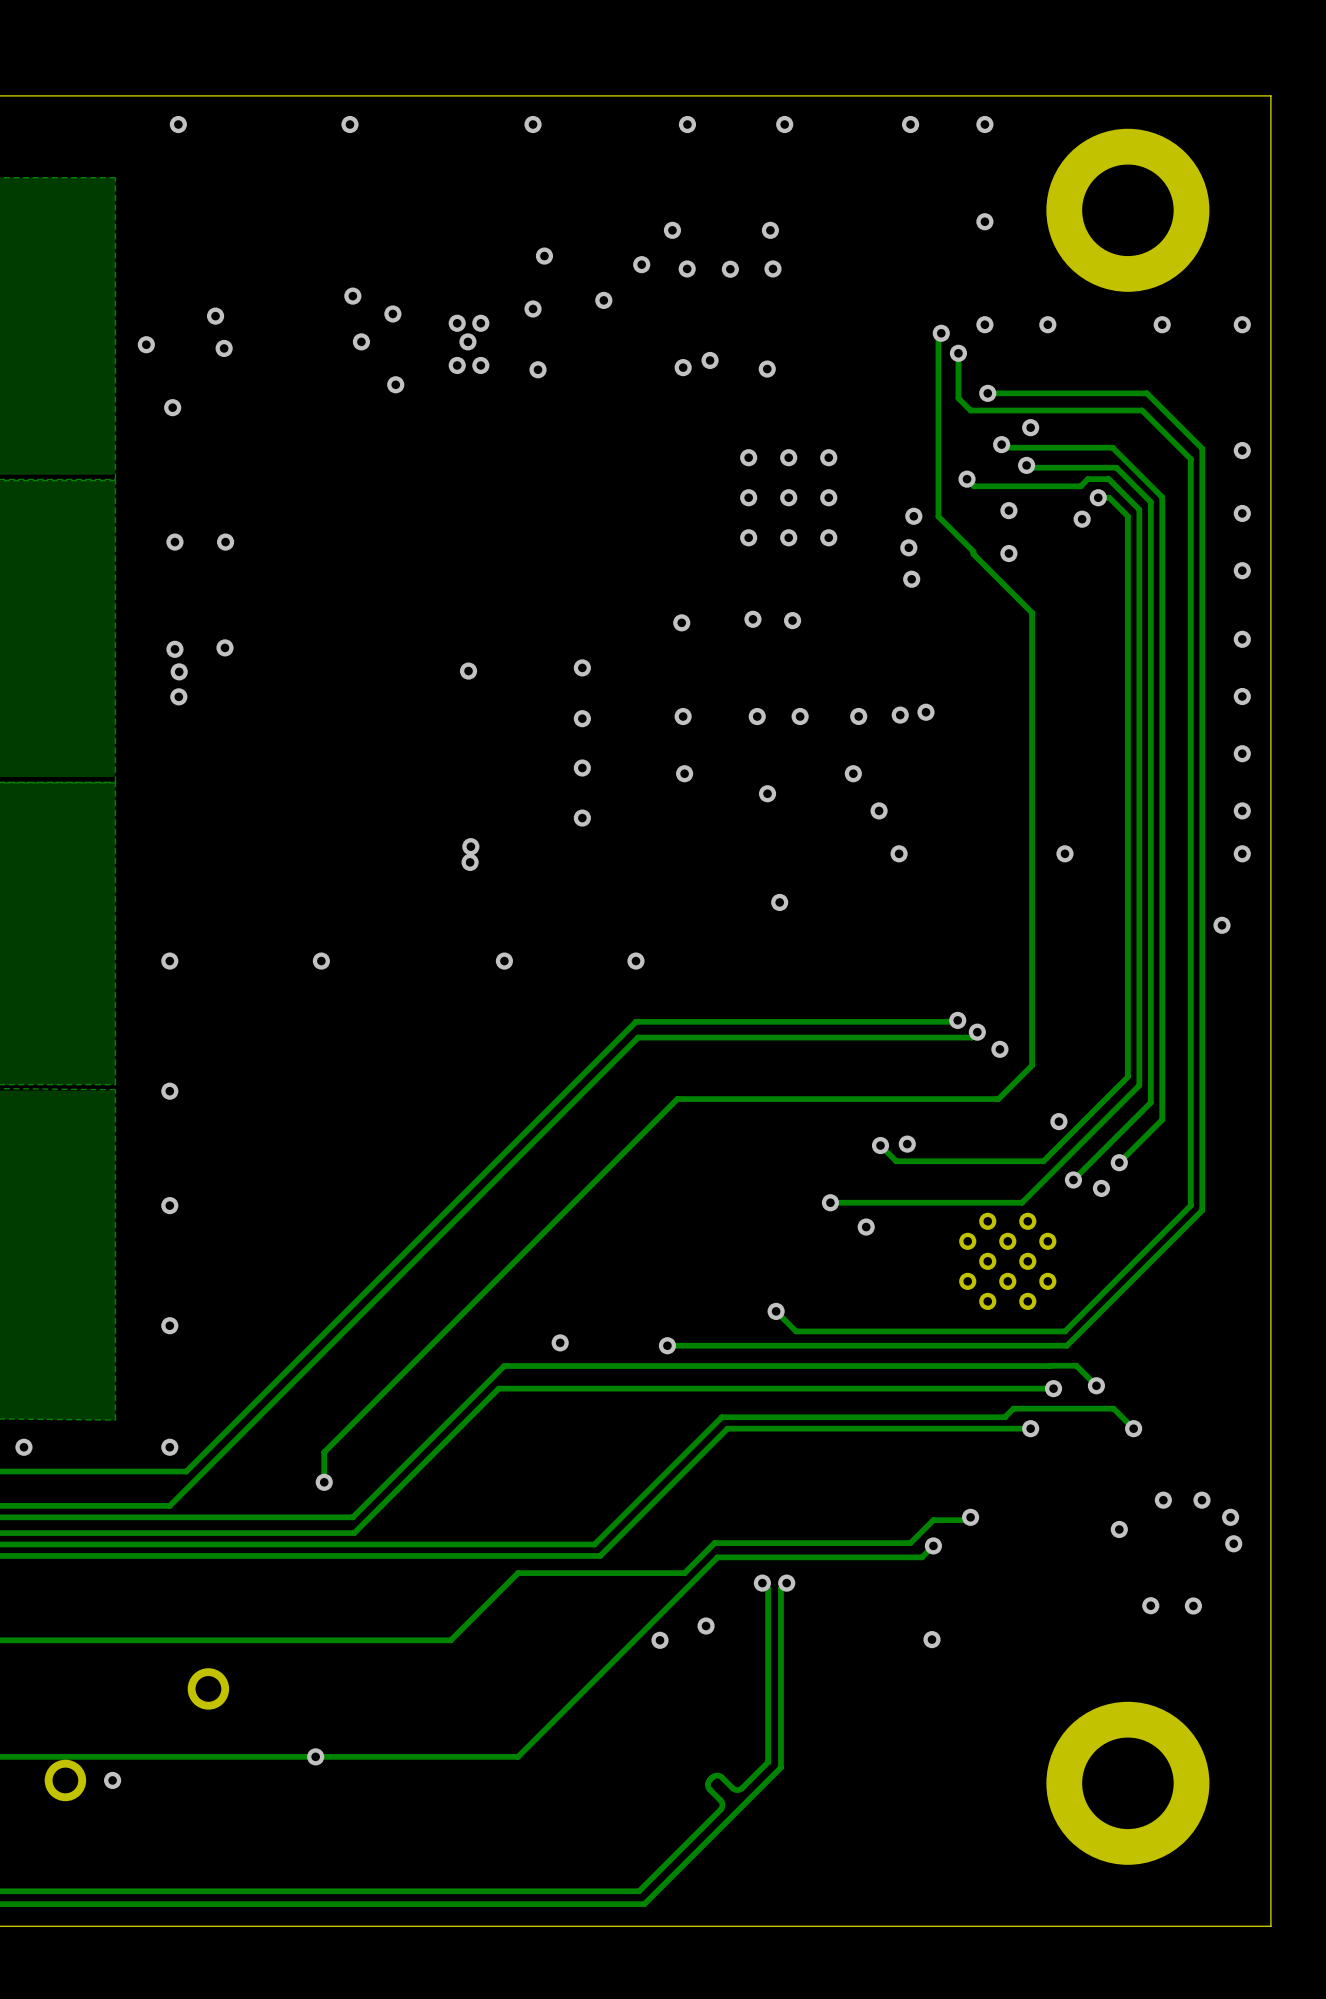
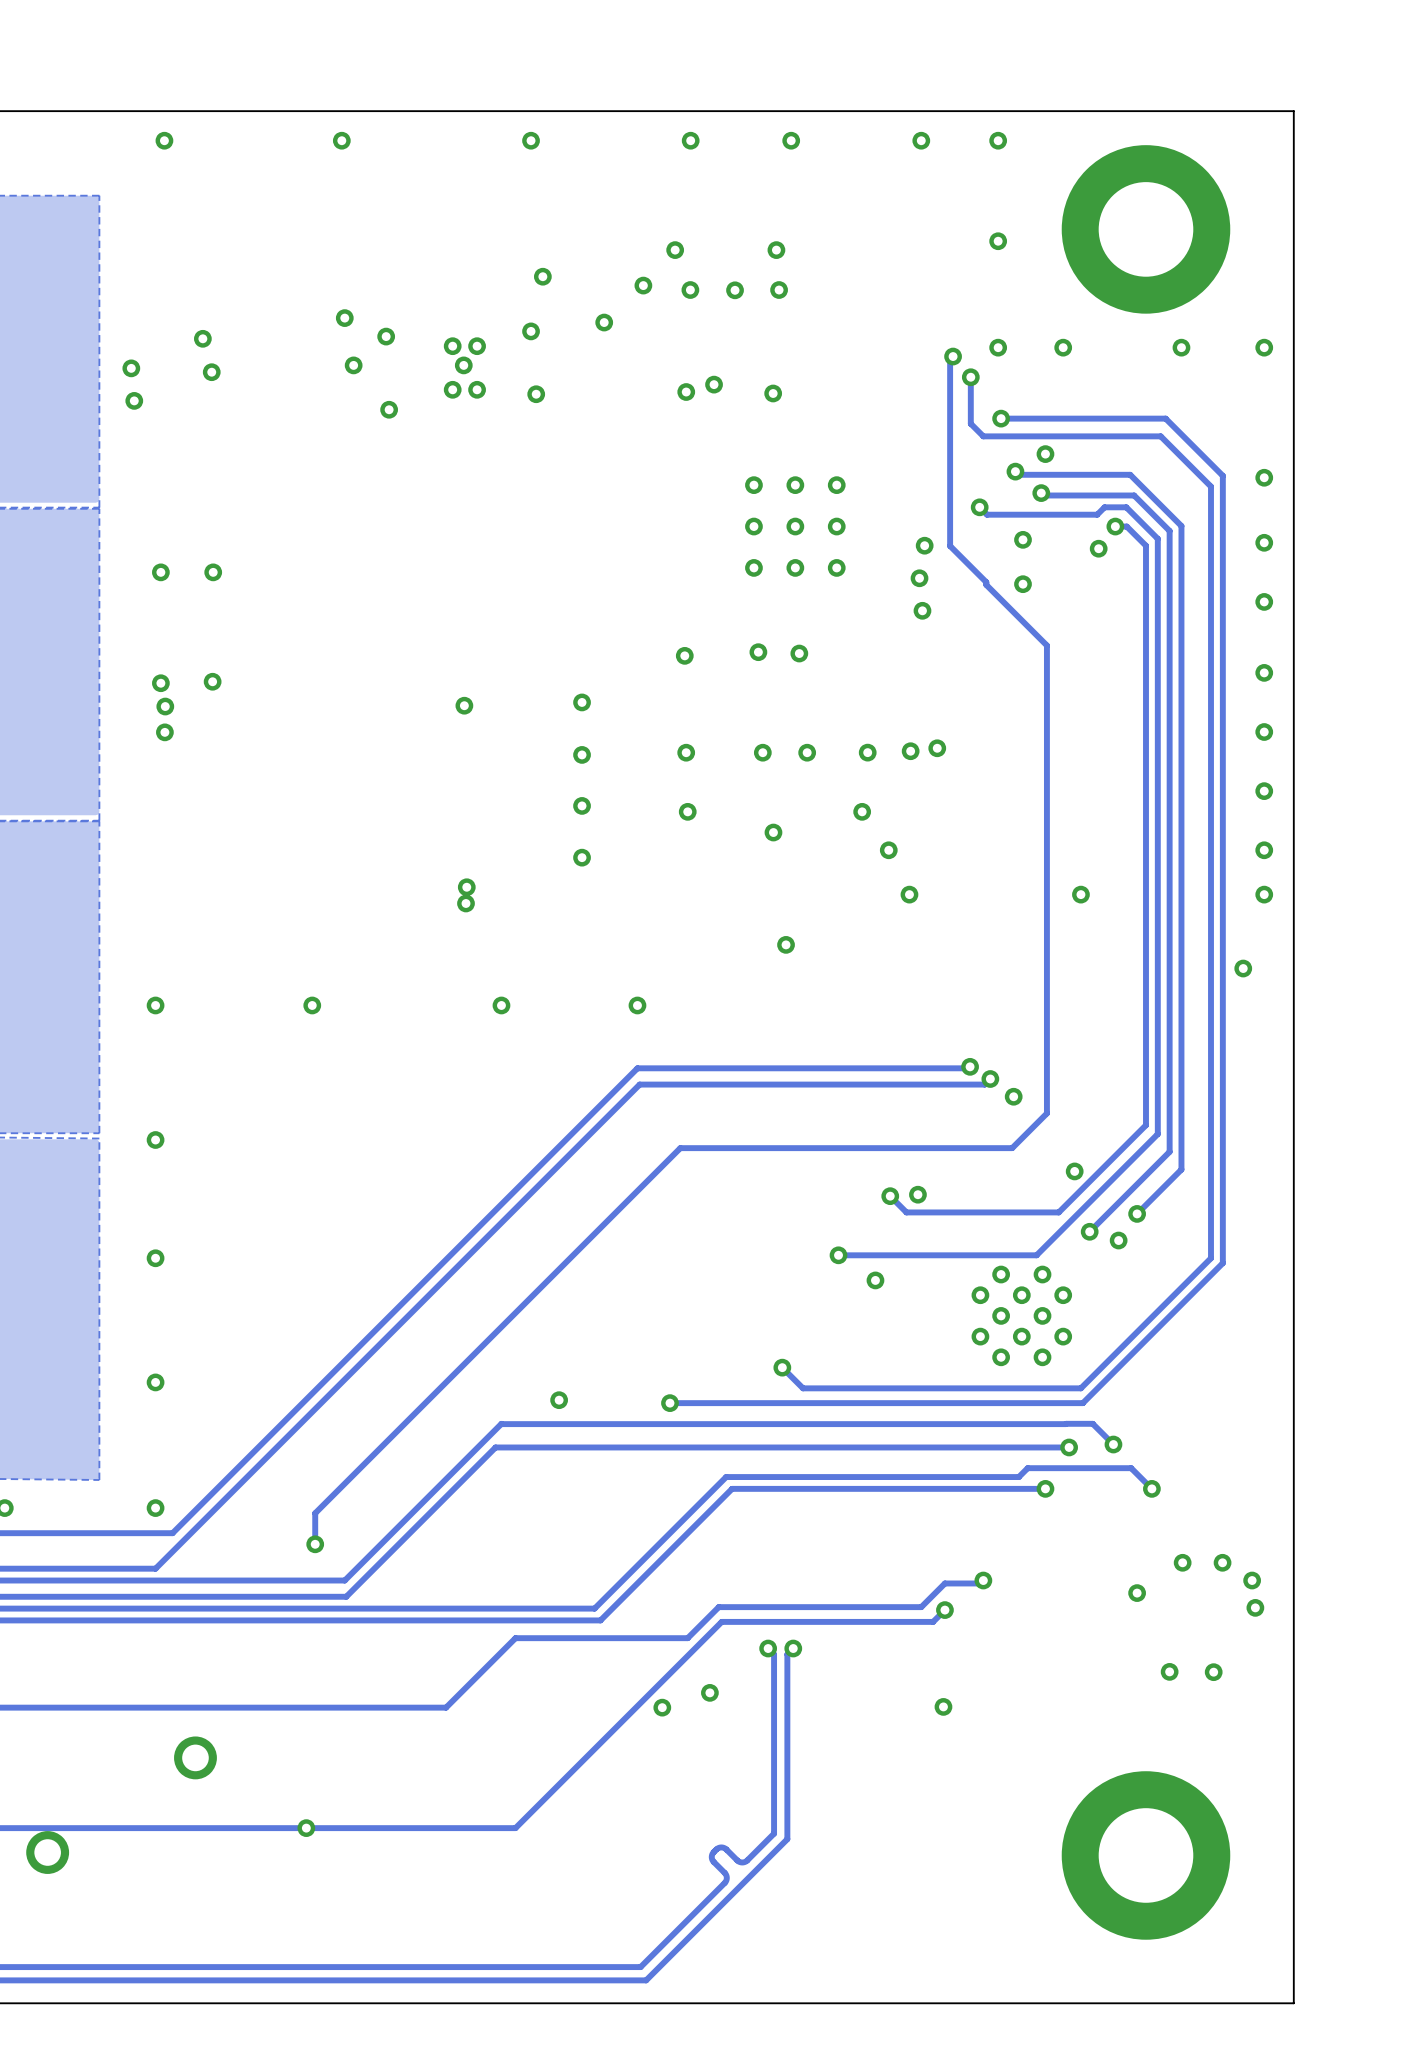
via position: (172, 407) -> (134, 400)
via: (112, 1780) -> none

